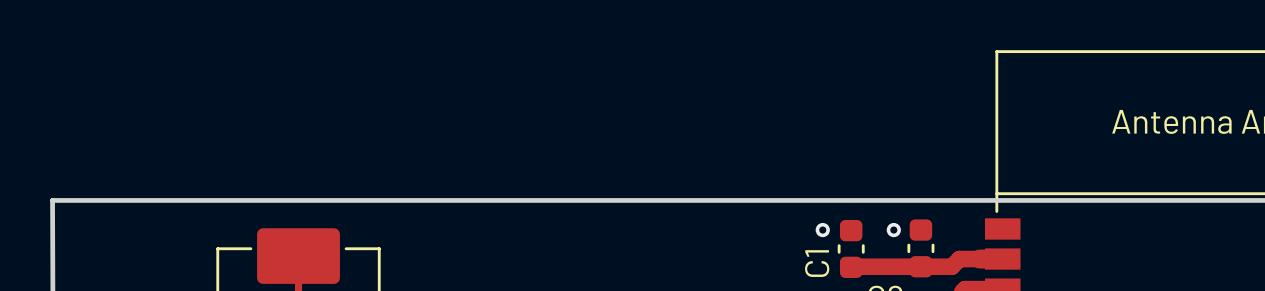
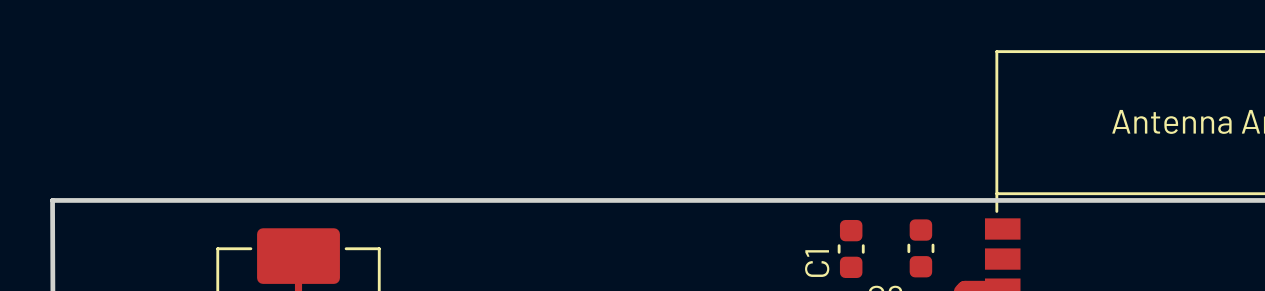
via: (822, 230) -> none
via: (893, 230) -> none
track: (1002, 259) (959, 259) (951, 266) (851, 267) -> none

